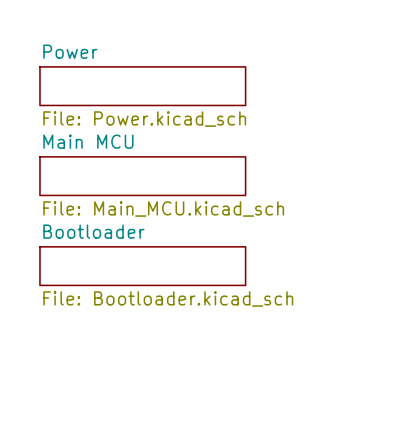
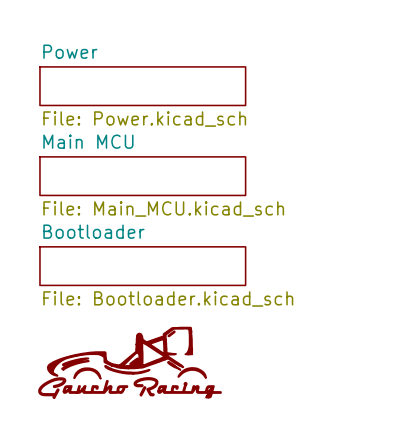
power symbol: none -> (130, 362)

